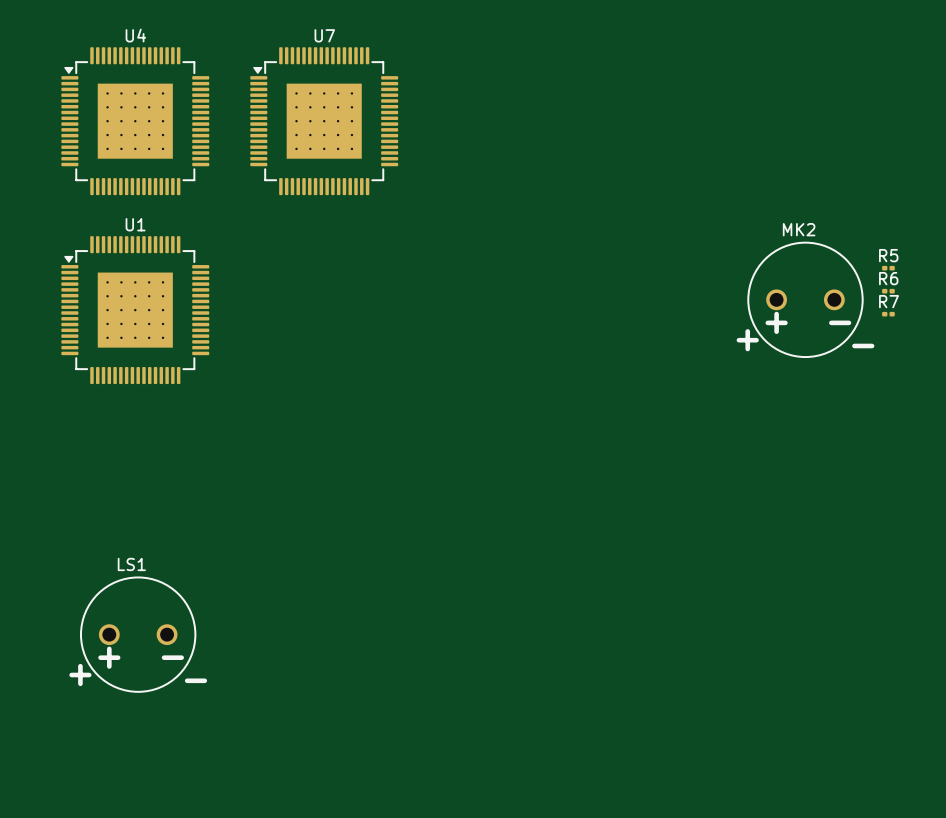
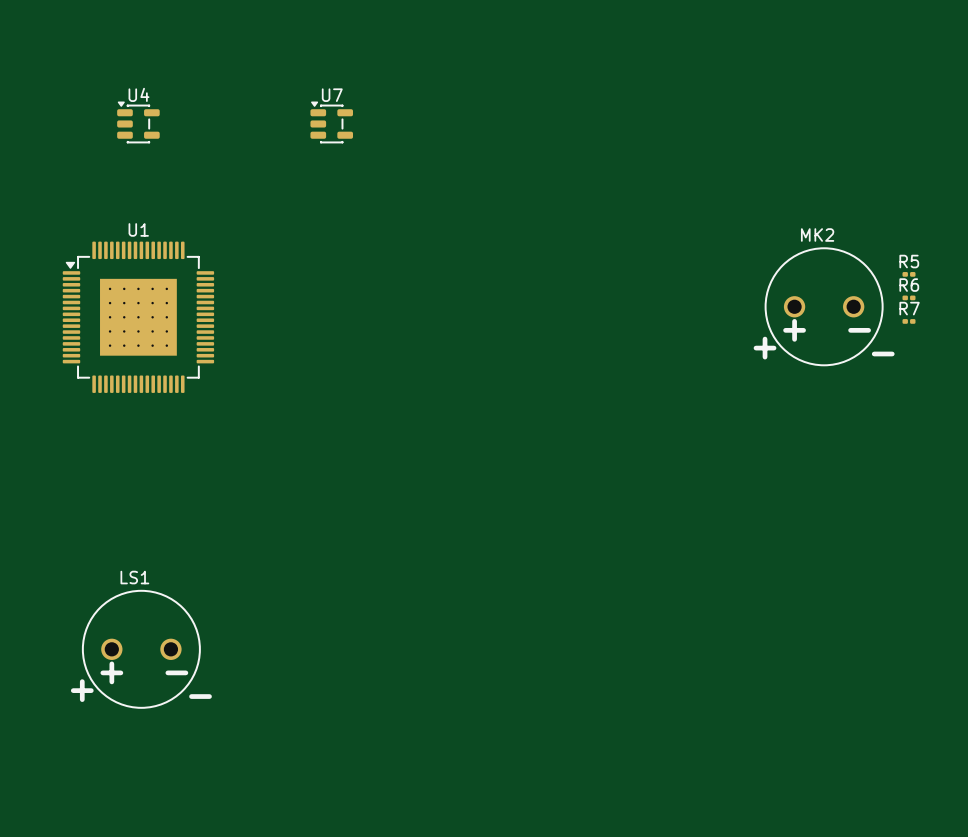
U4 name position: U4 (135, 35) -> U4 (138, 94)
U7 name position: U7 (324, 35) -> U7 (332, 95)
U4 footprint: [61, 47, 210, 196] -> [117, 101, 160, 144]
U7 footprint: [250, 47, 399, 196] -> [310, 101, 354, 144]

